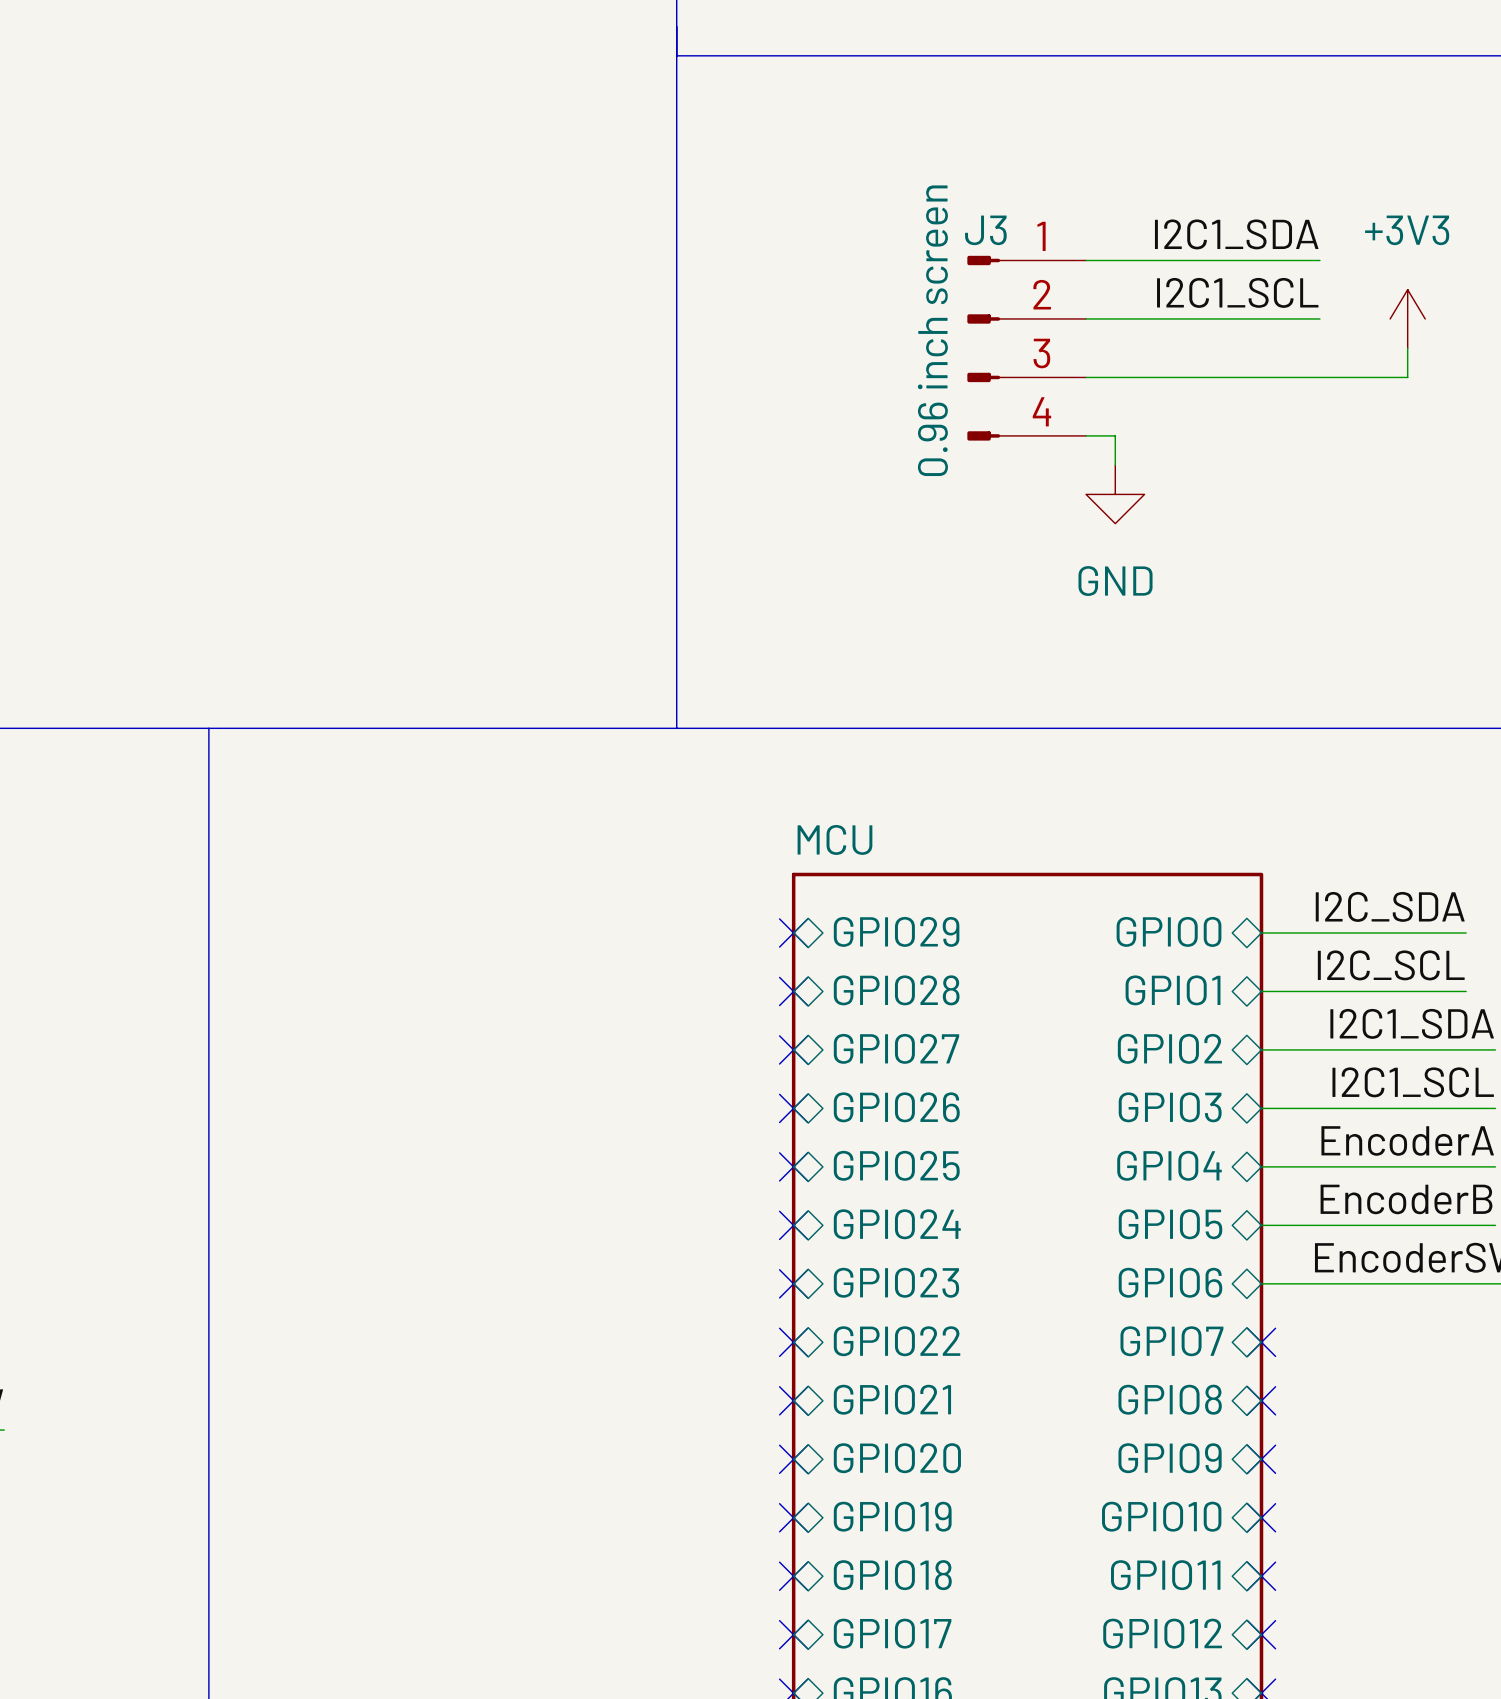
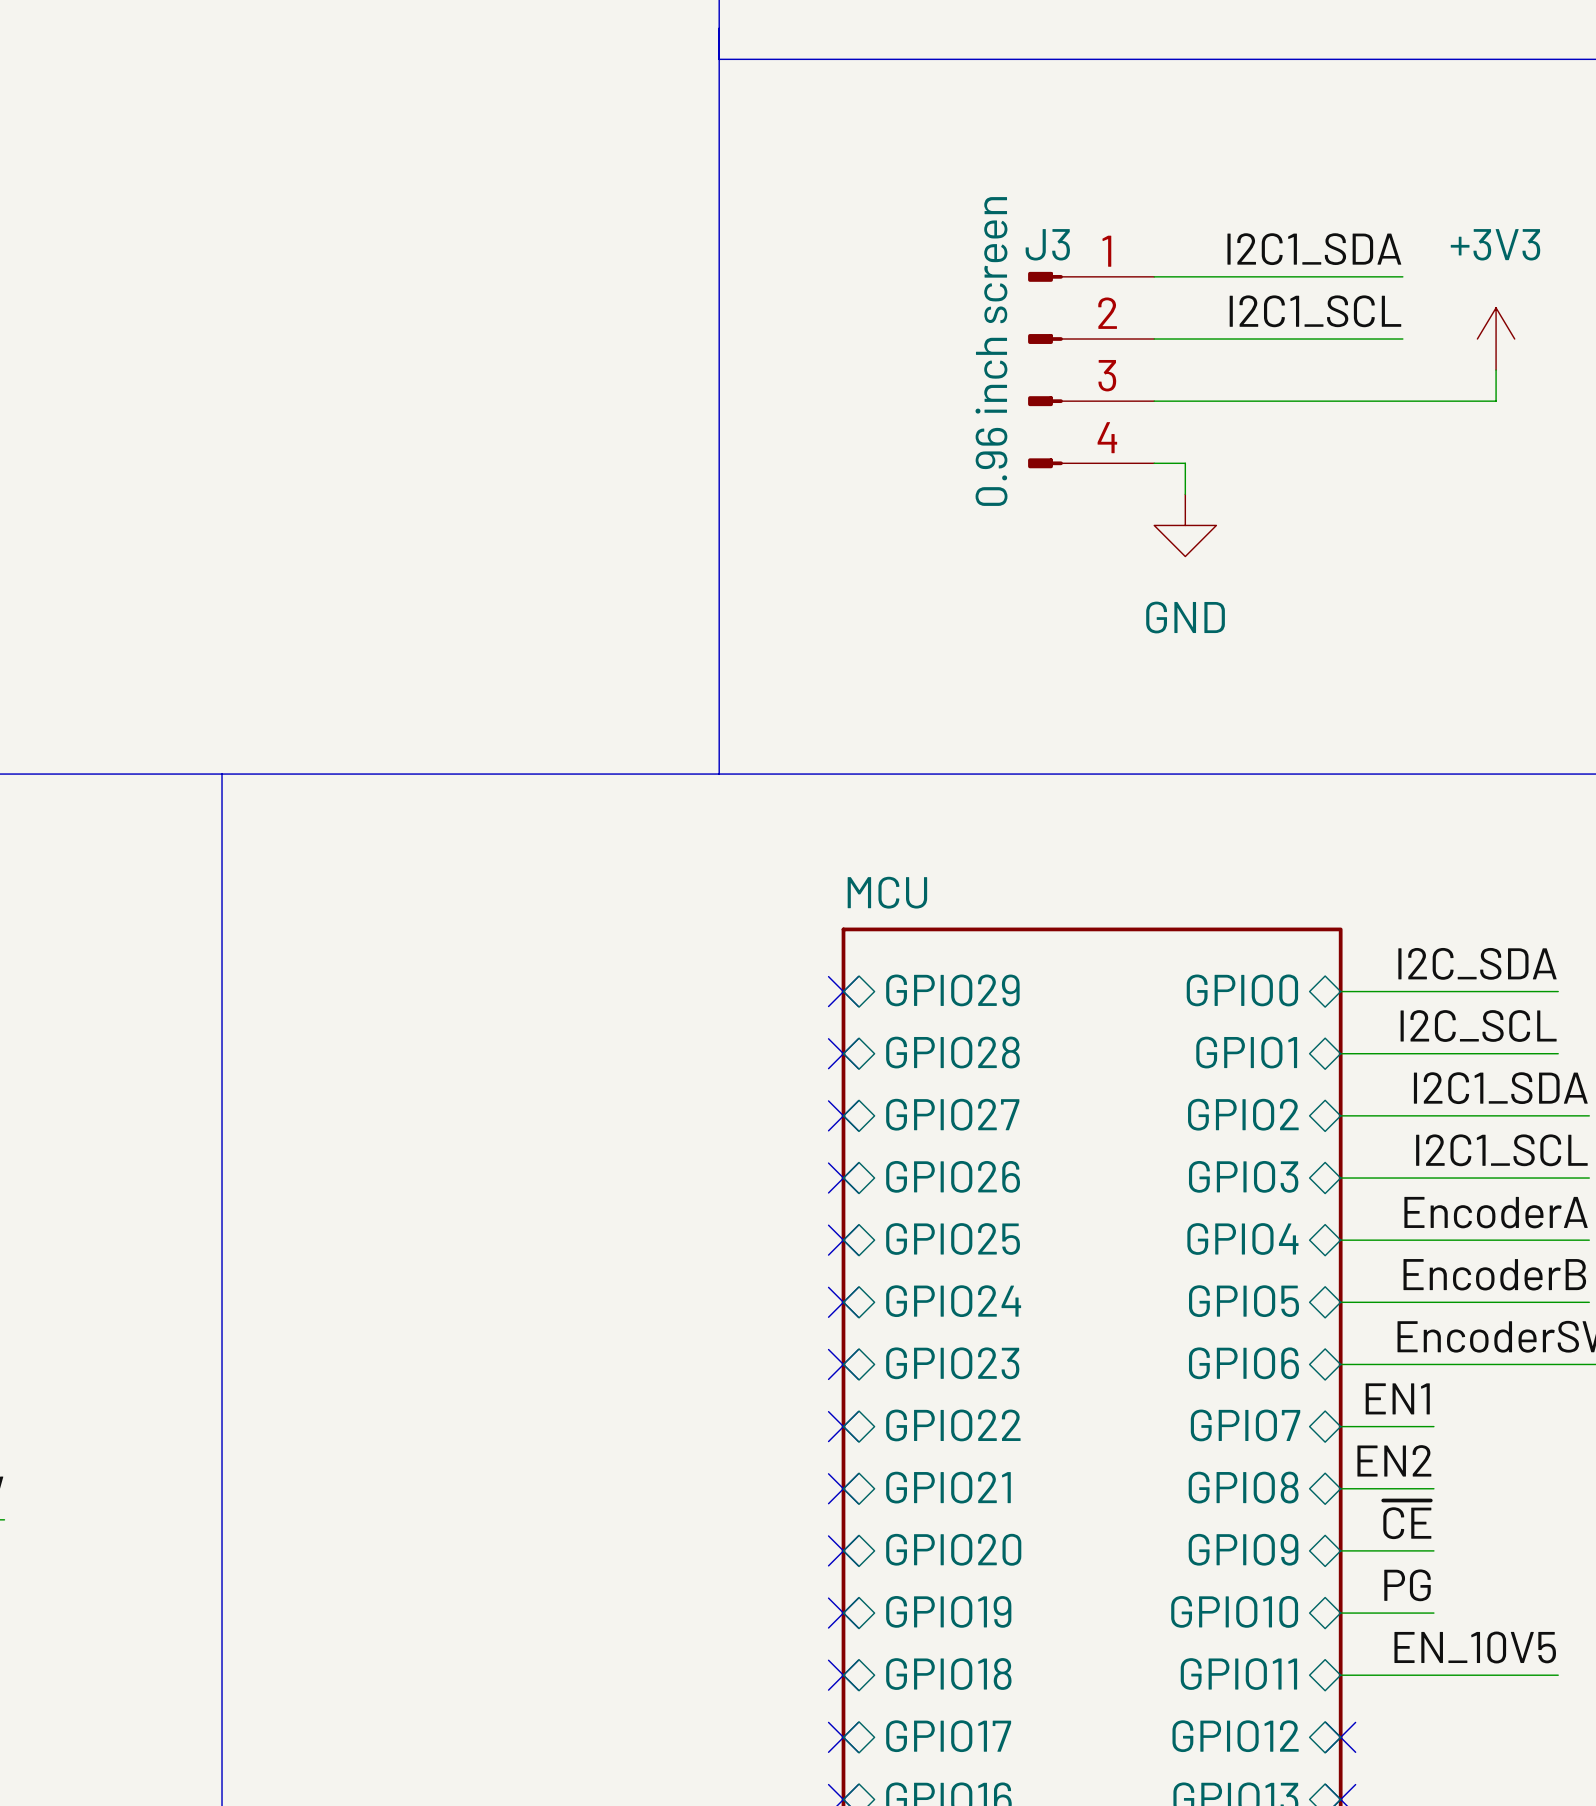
label: none -> EN1 (1397, 1398)
wire: none -> (1340, 1426) (1433, 1426)
no-connect mark: (1261, 1342) -> none
label: none -> EN2 (1394, 1460)
wire: none -> (1340, 1488) (1433, 1488)
no-connect mark: (1261, 1400) -> none
label: none -> ~{CE} (1407, 1519)
wire: none -> (1340, 1550) (1433, 1550)
no-connect mark: (1261, 1459) -> none
label: none -> PG (1407, 1585)
wire: none -> (1340, 1613) (1433, 1613)
no-connect mark: (1261, 1517) -> none
label: none -> EN_10V5 (1475, 1647)
wire: none -> (1340, 1675) (1558, 1675)
no-connect mark: (1261, 1576) -> none

